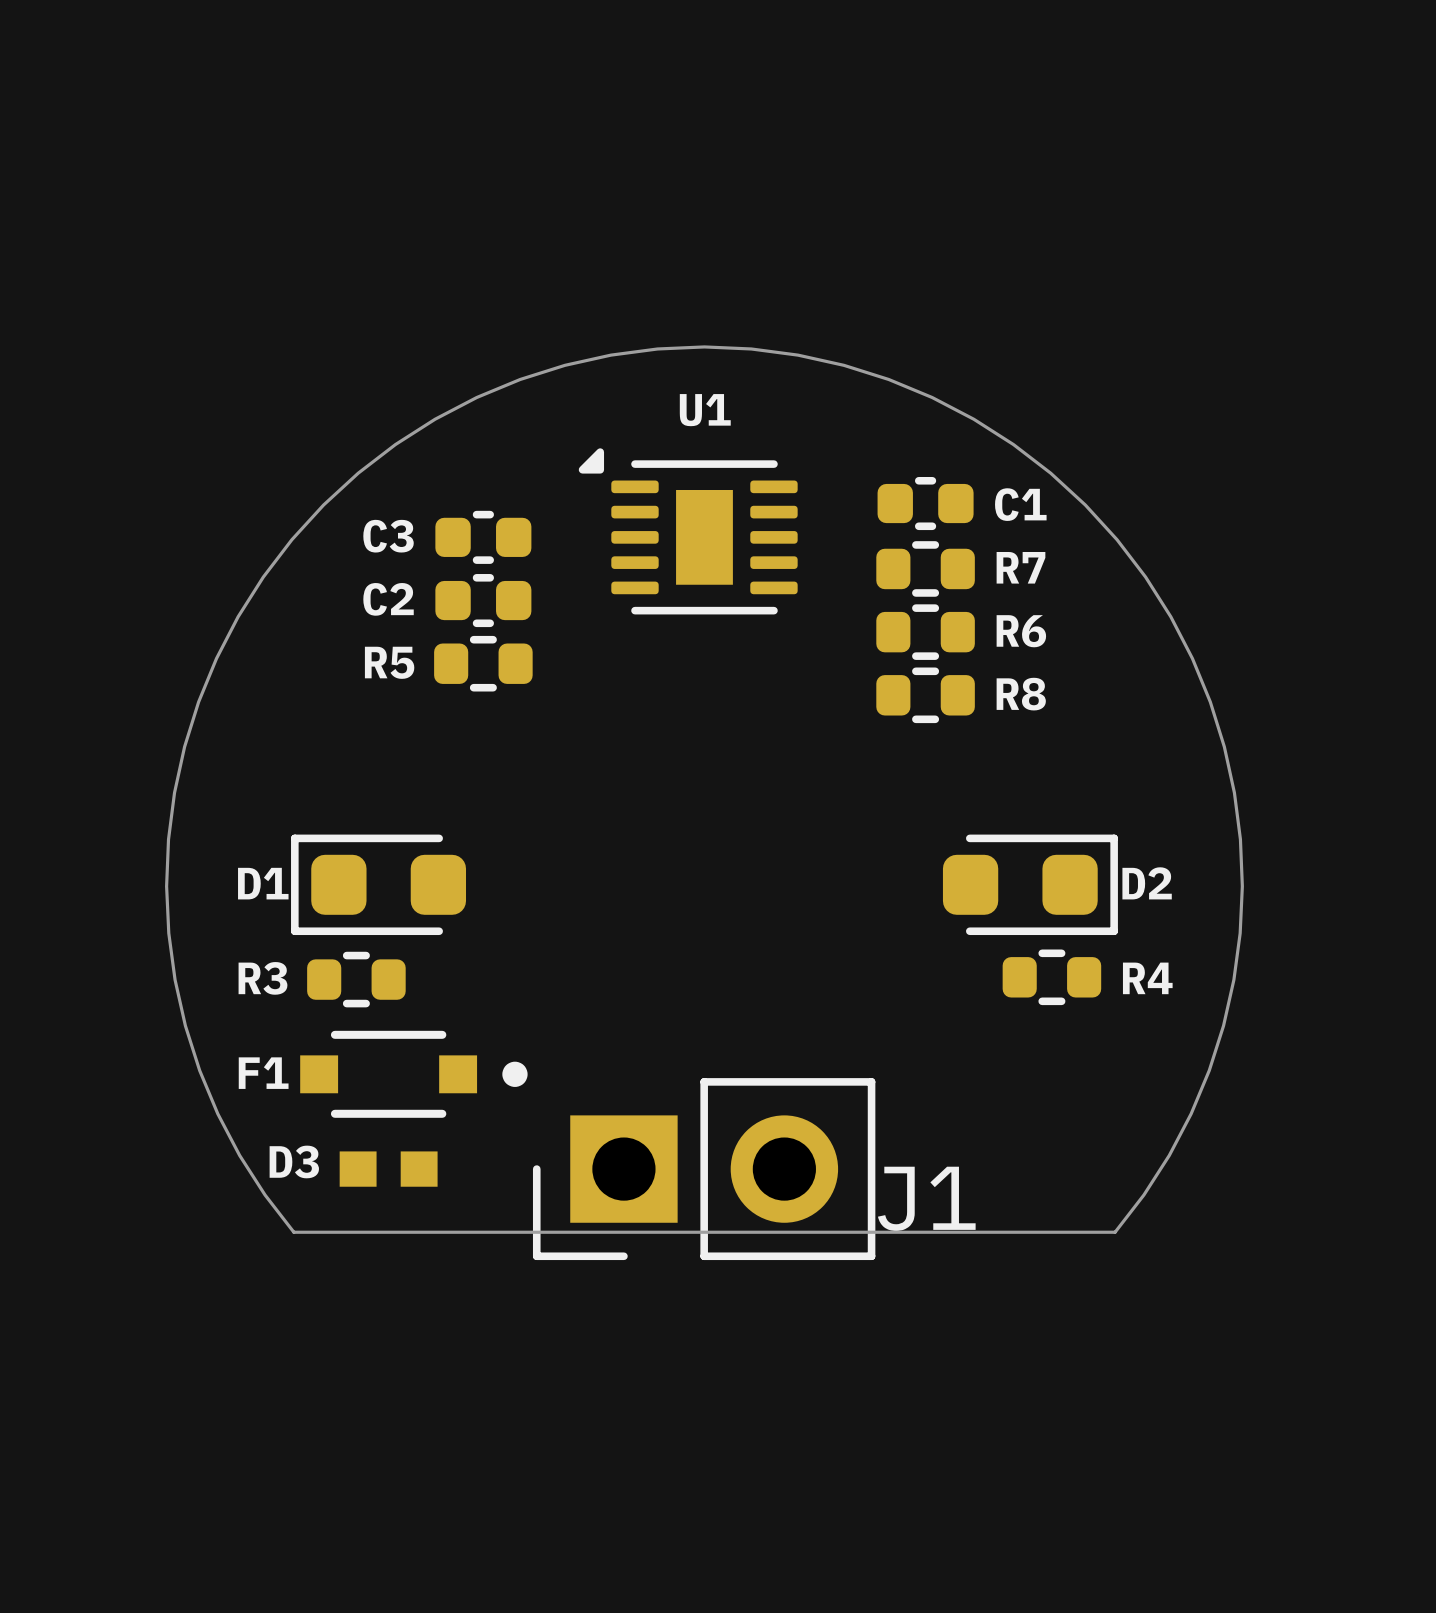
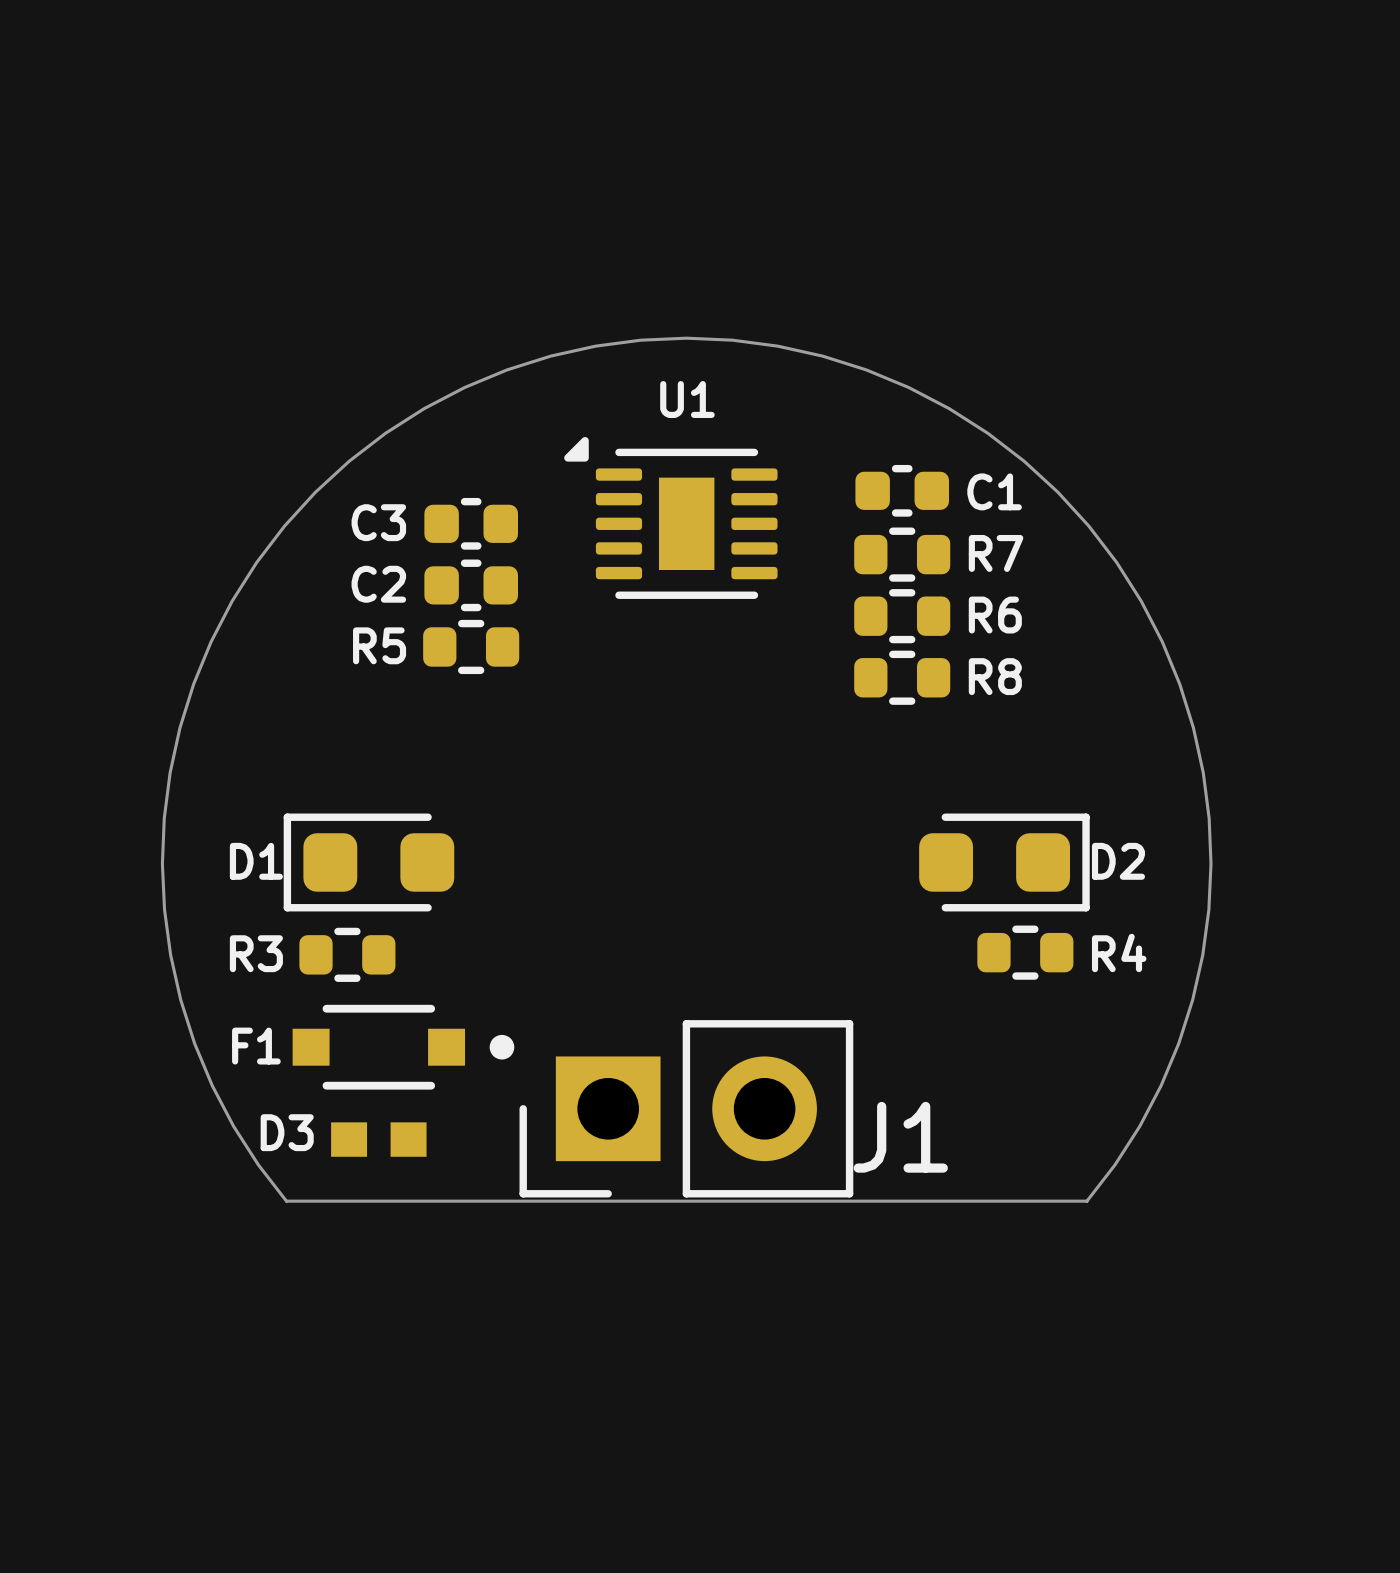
J1 position: (704, 1169) -> (686, 1108)

